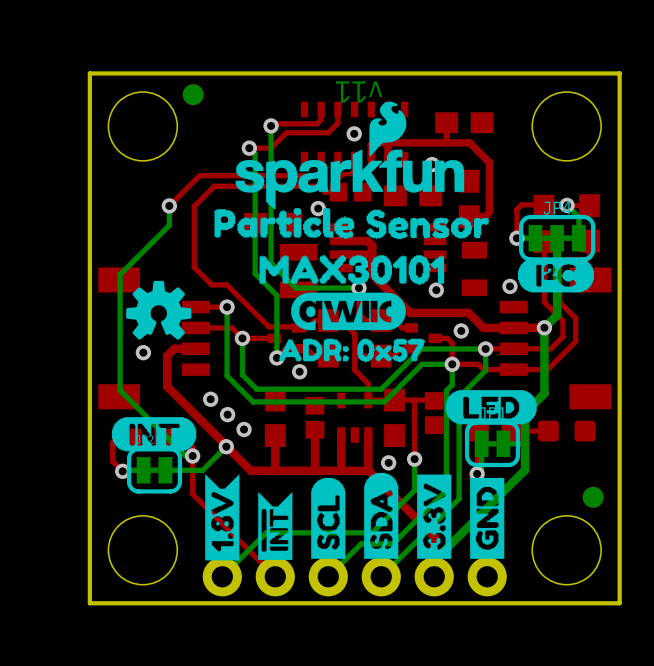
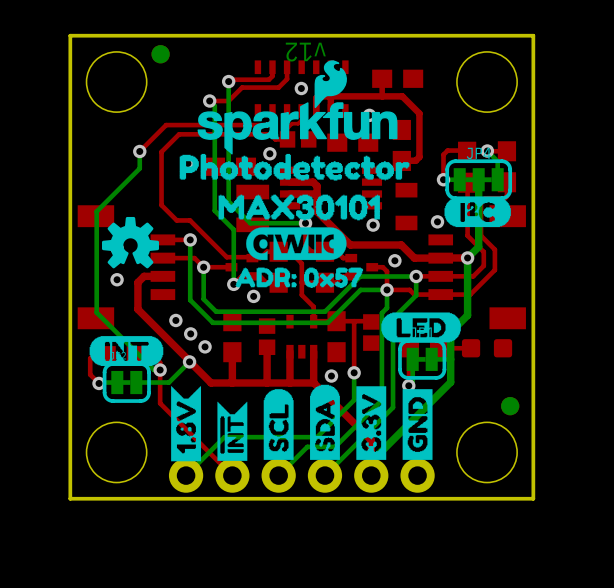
text: v11 (359, 92) -> v12 (305, 52)
drawing: [214, 208, 490, 240] -> none
drawing: none -> [179, 153, 410, 181]

